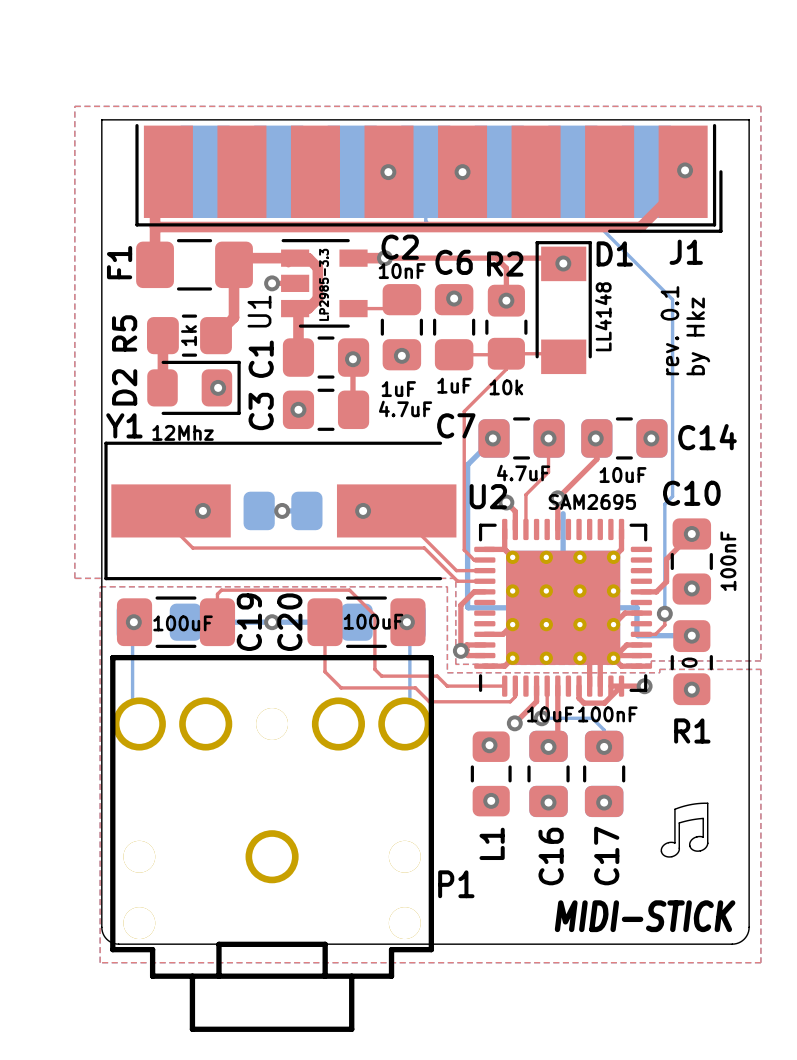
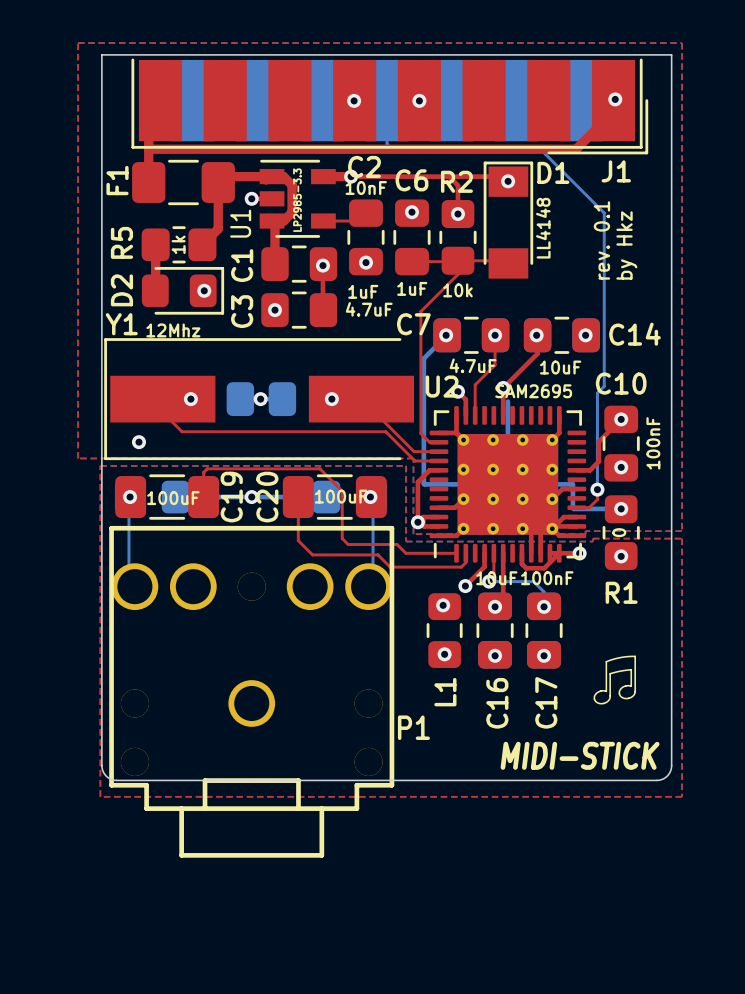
via: none -> (138, 442)

